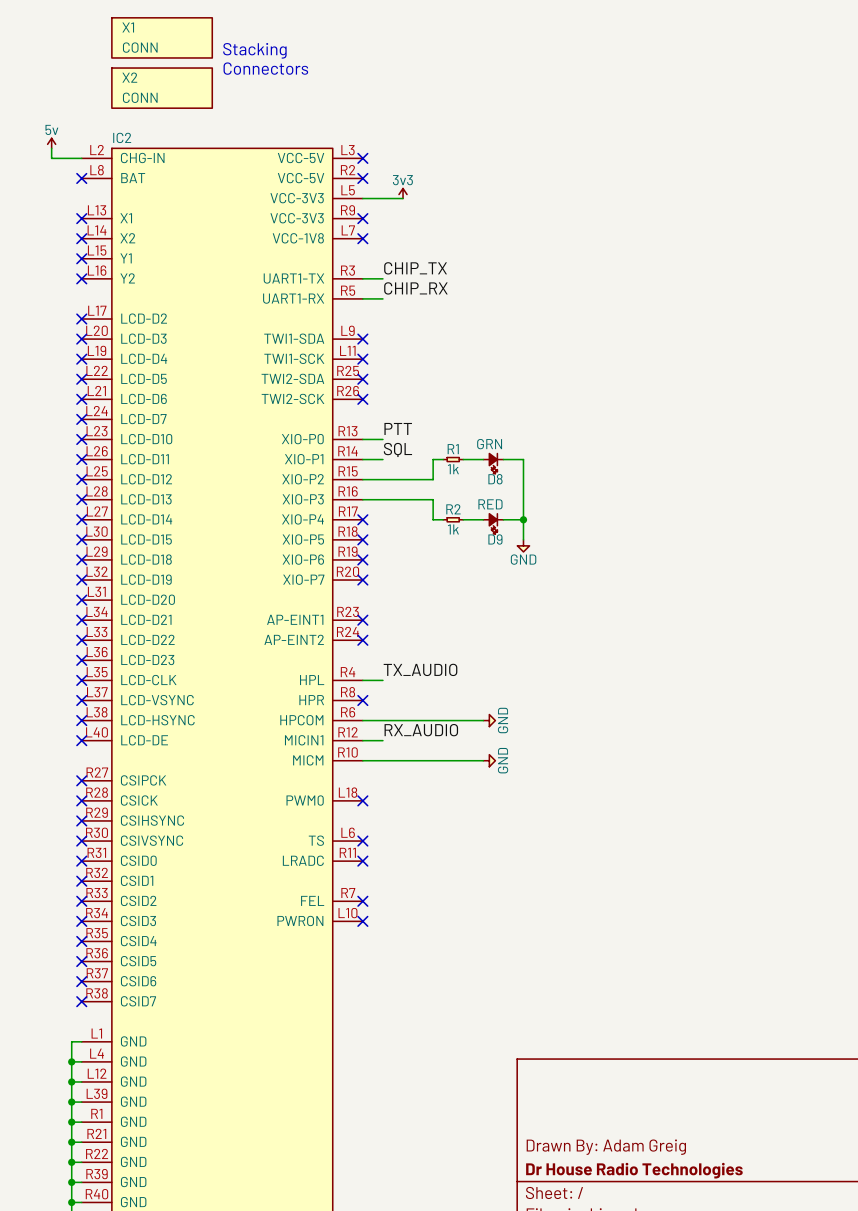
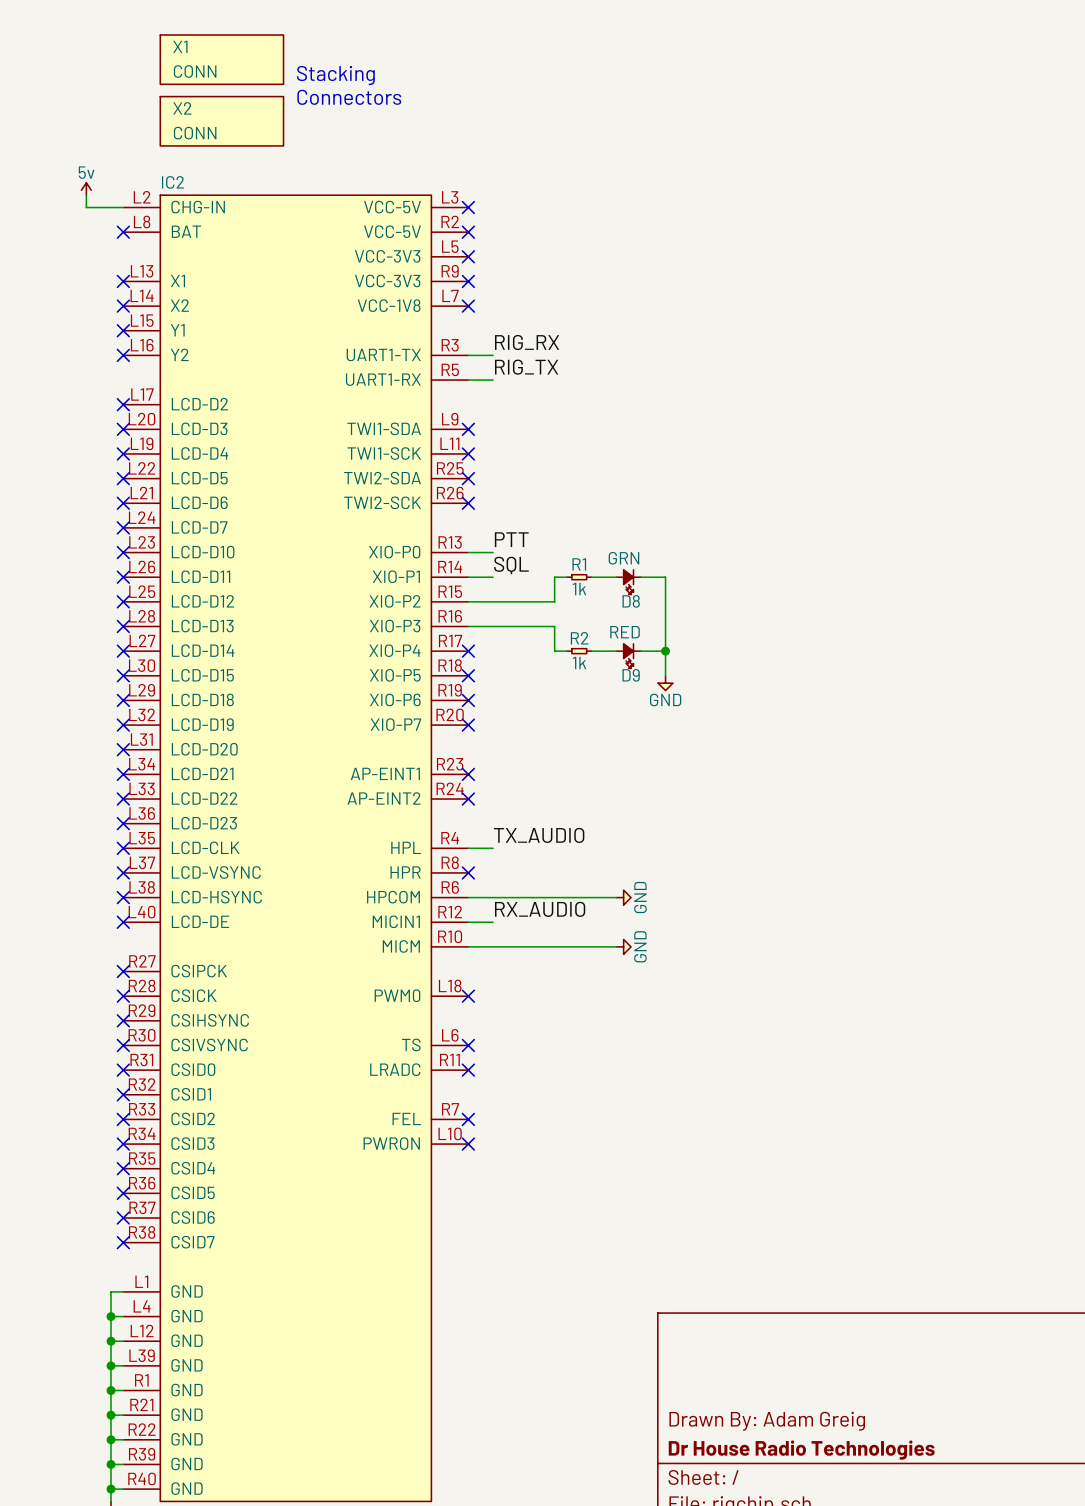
power symbol: 3v3 (403, 193) -> none
wire: (362, 198) (403, 198) -> none
no-connect mark: none -> (468, 256)
label: CHIP_TX (415, 268) -> RIG_RX (527, 342)
label: CHIP_RX (415, 288) -> RIG_TX (526, 367)

